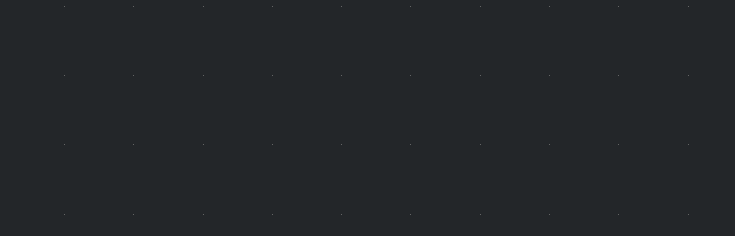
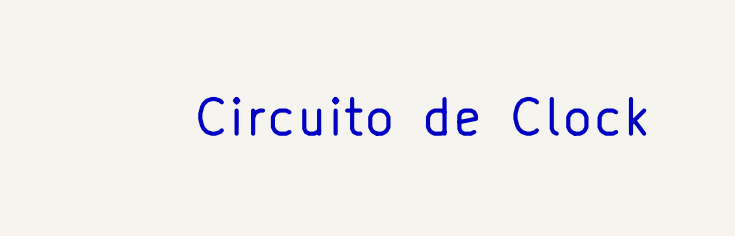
text: none -> Circuito de Clock (422, 116)

